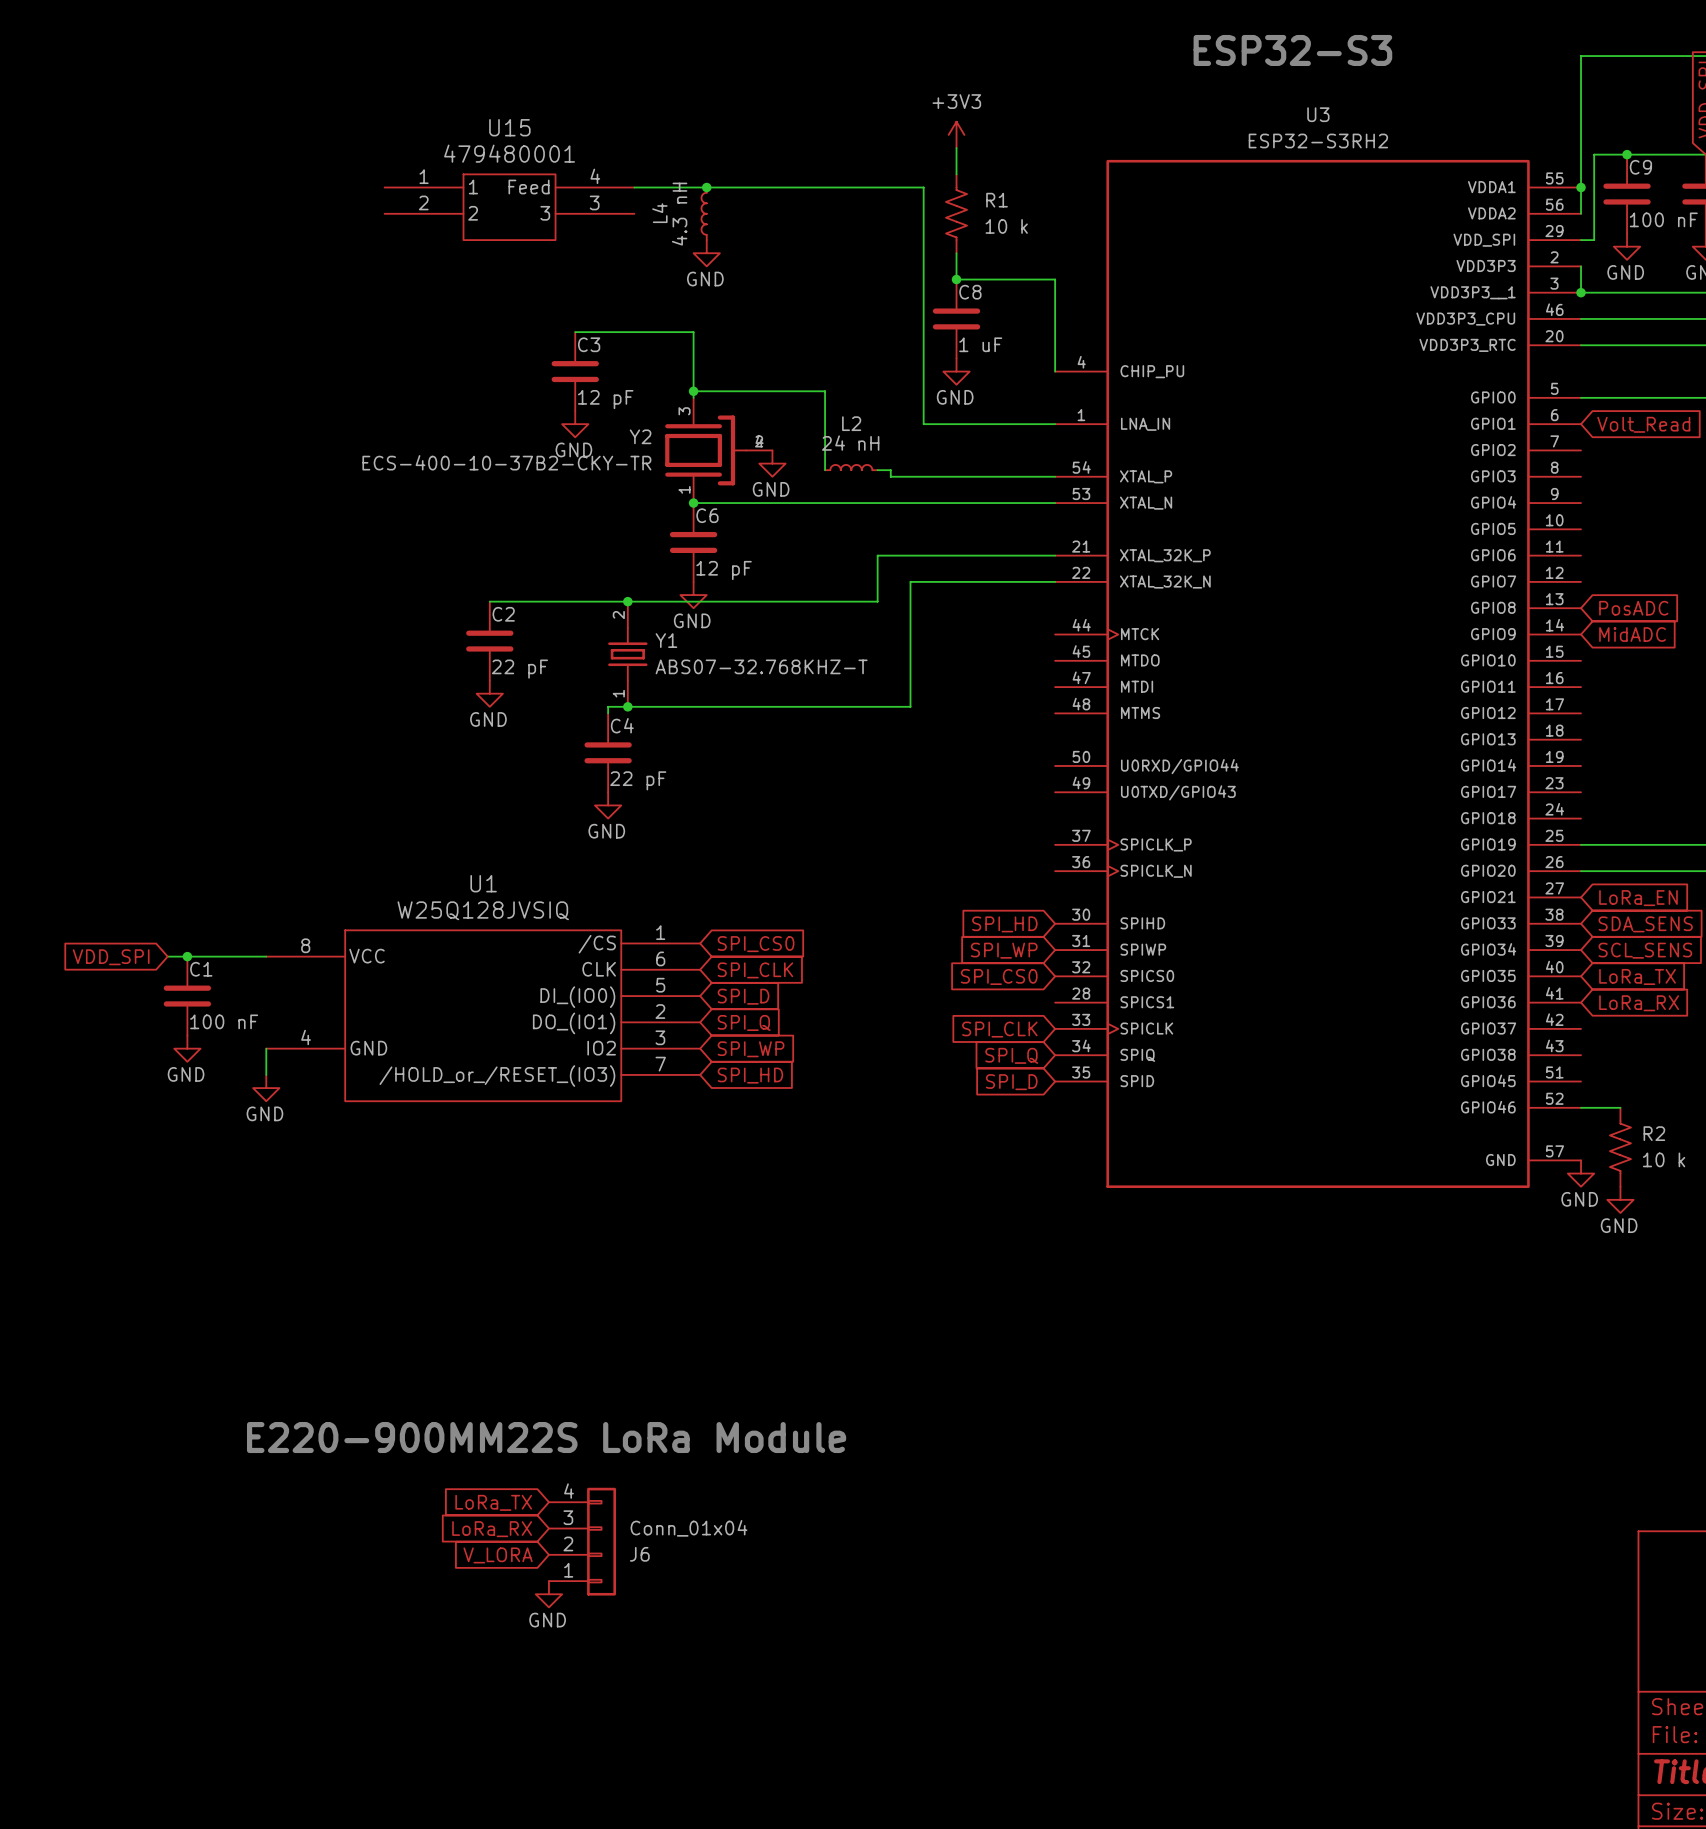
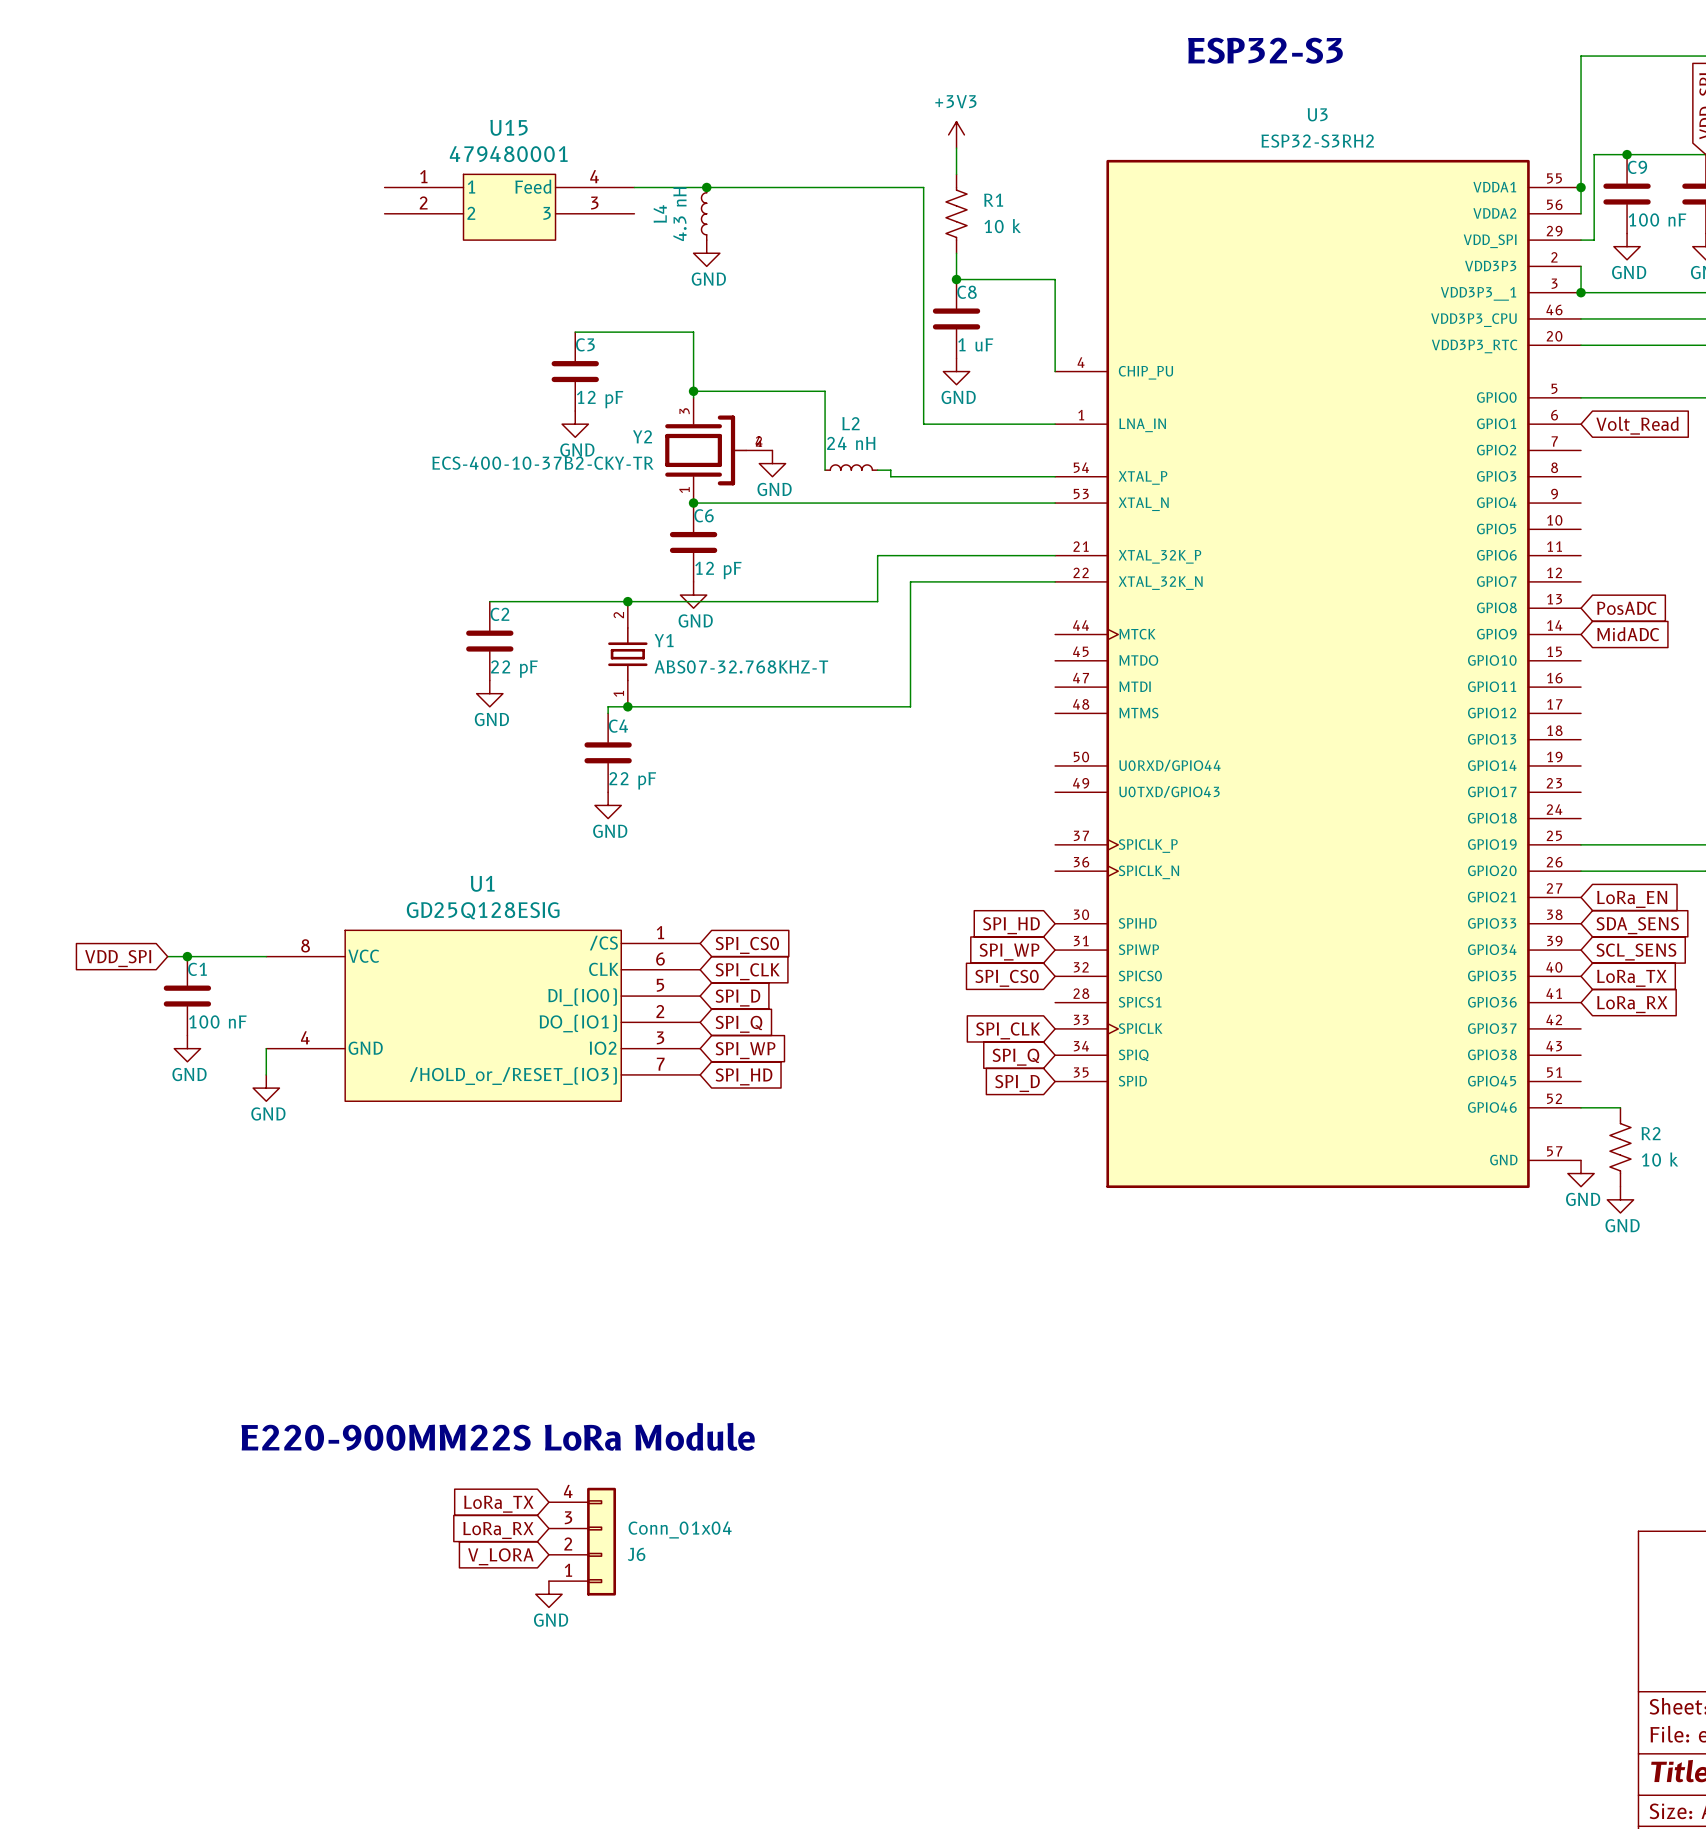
U1 value: W25Q128JVSIQ (483, 910) -> GD25Q128ESIG (483, 910)

